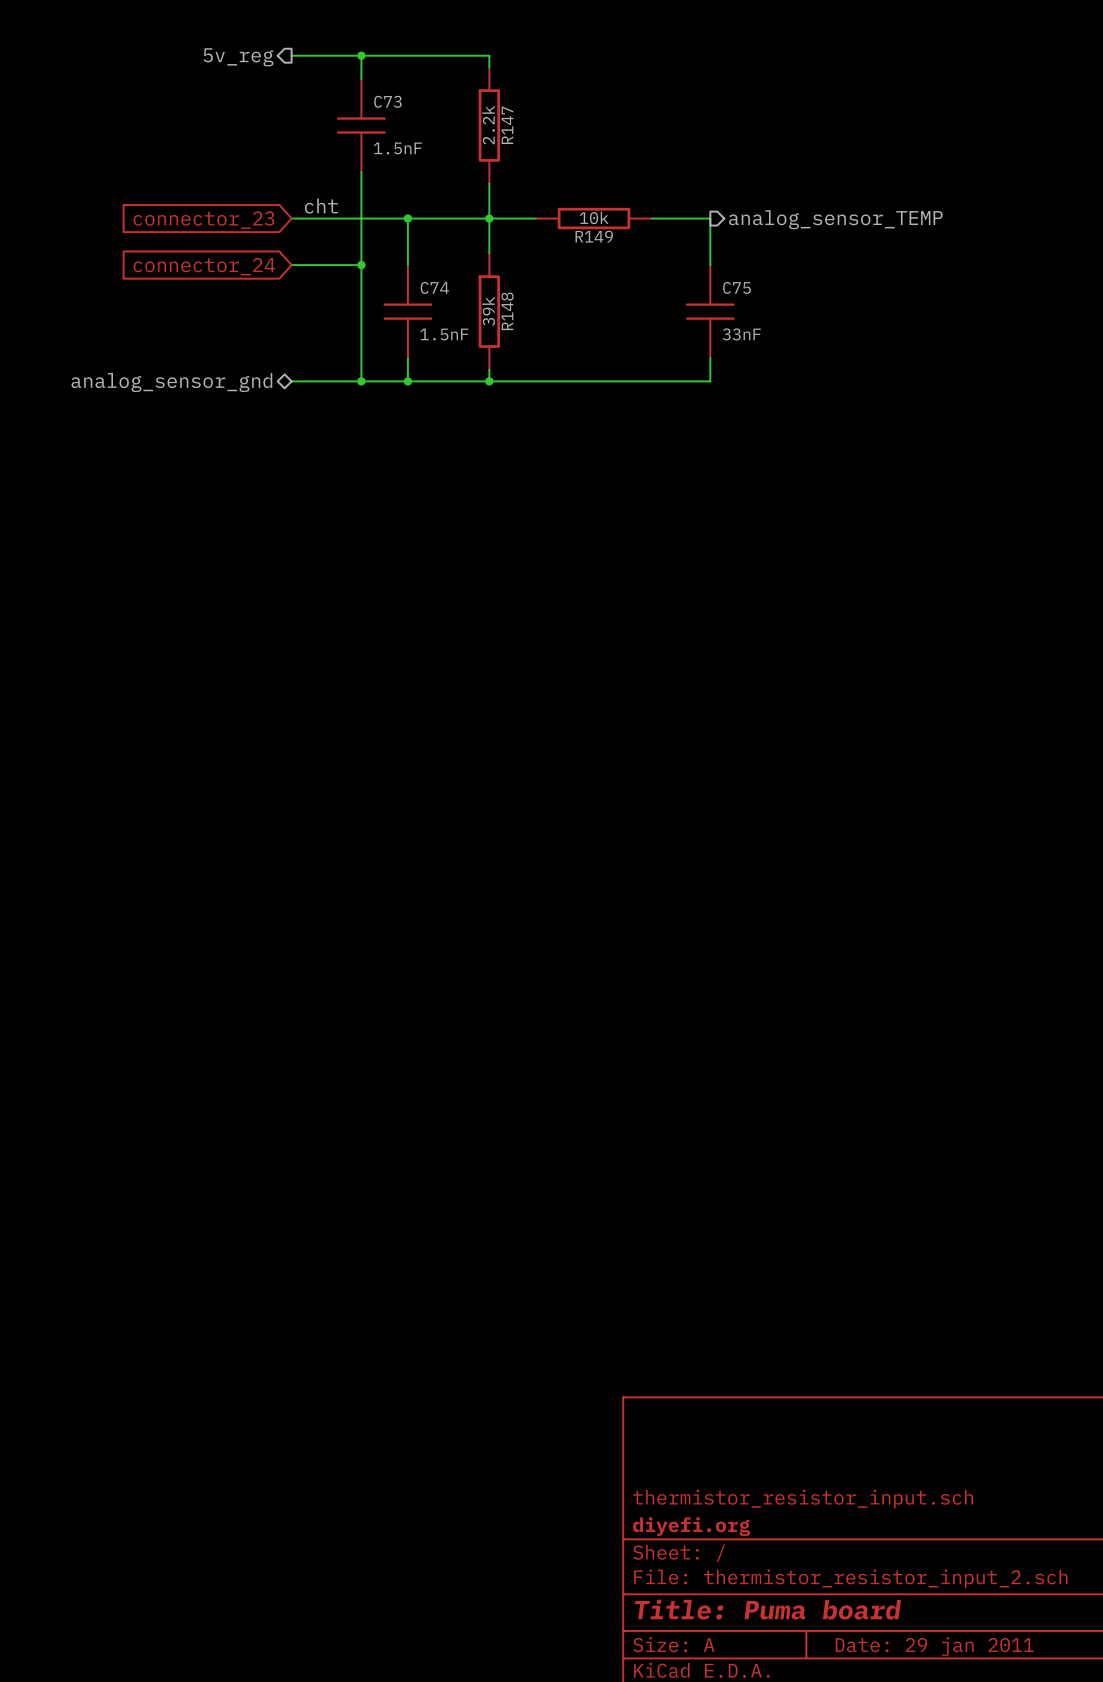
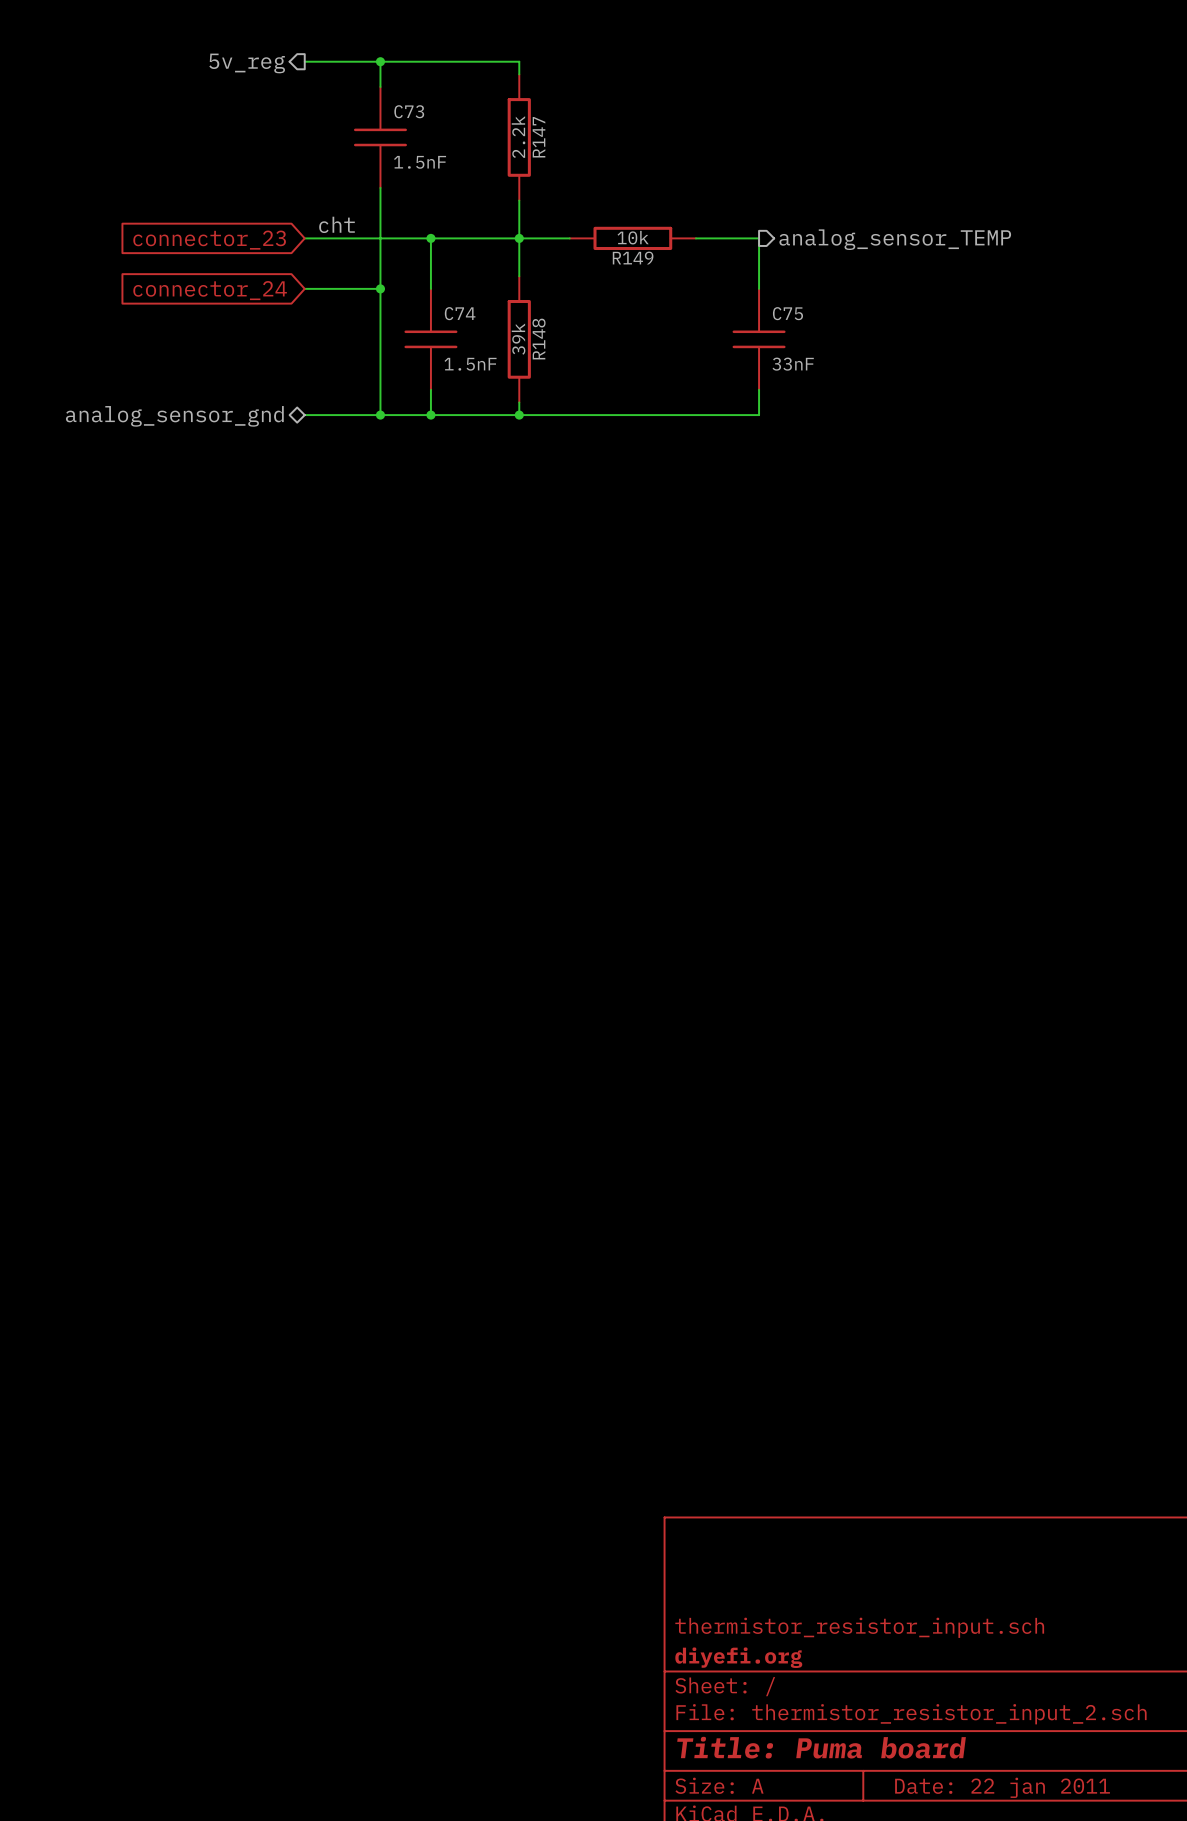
title block: Date: 29 jan 2011 (934, 1646) -> Date: 22 jan 2011 (1002, 1787)

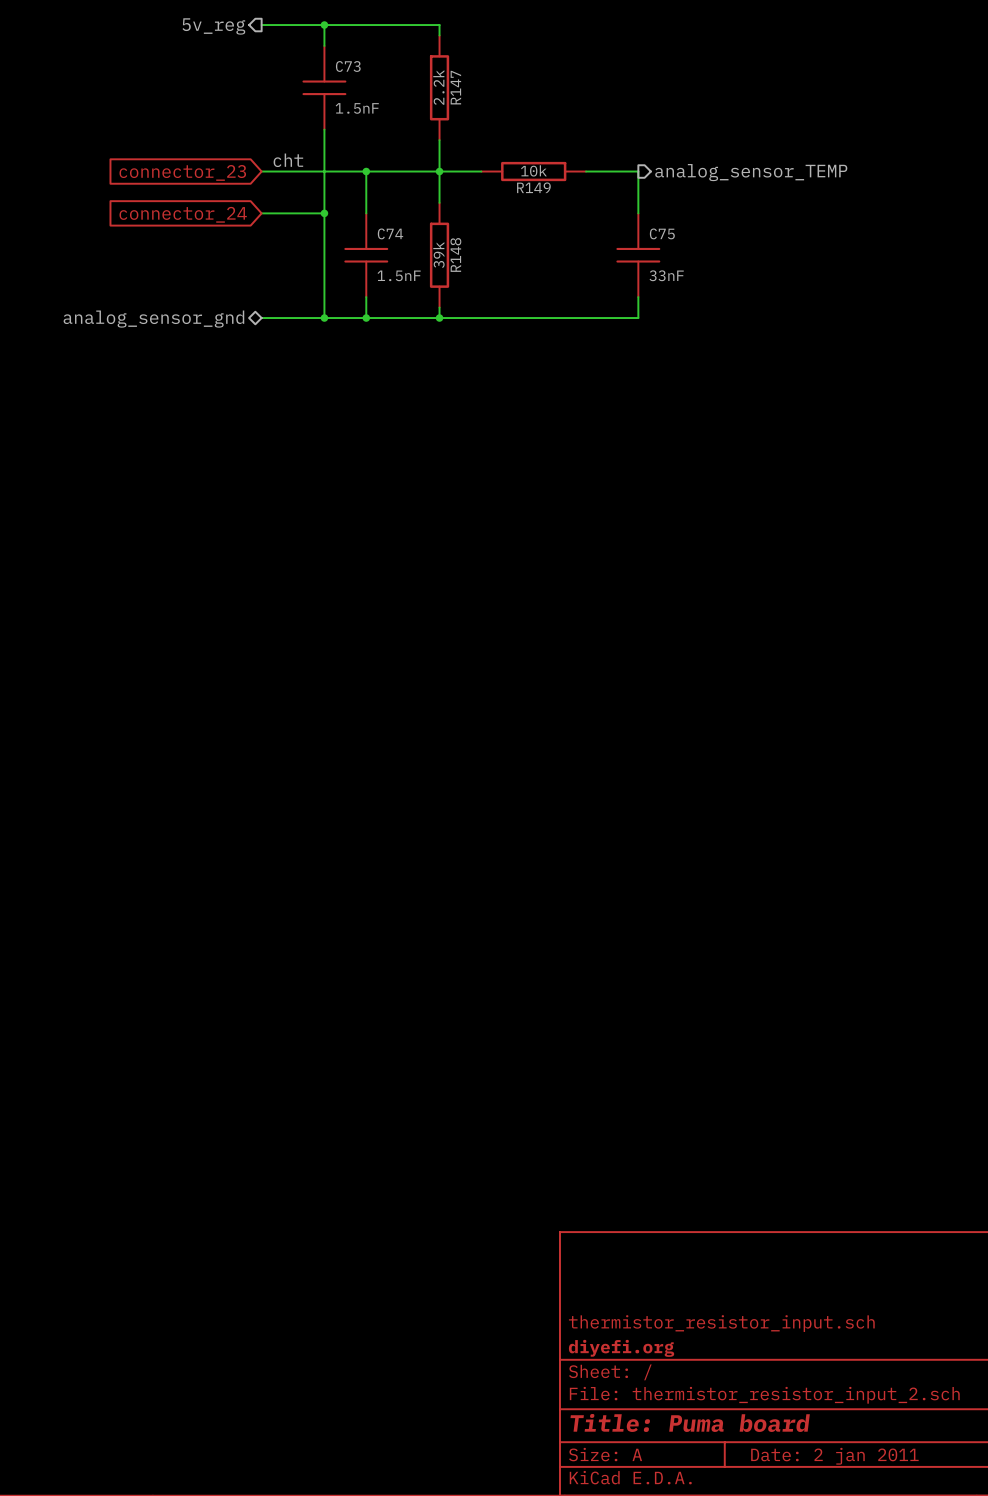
title block: Date: 22 jan 2011 (1002, 1787) -> Date: 2 jan 2011 (834, 1456)

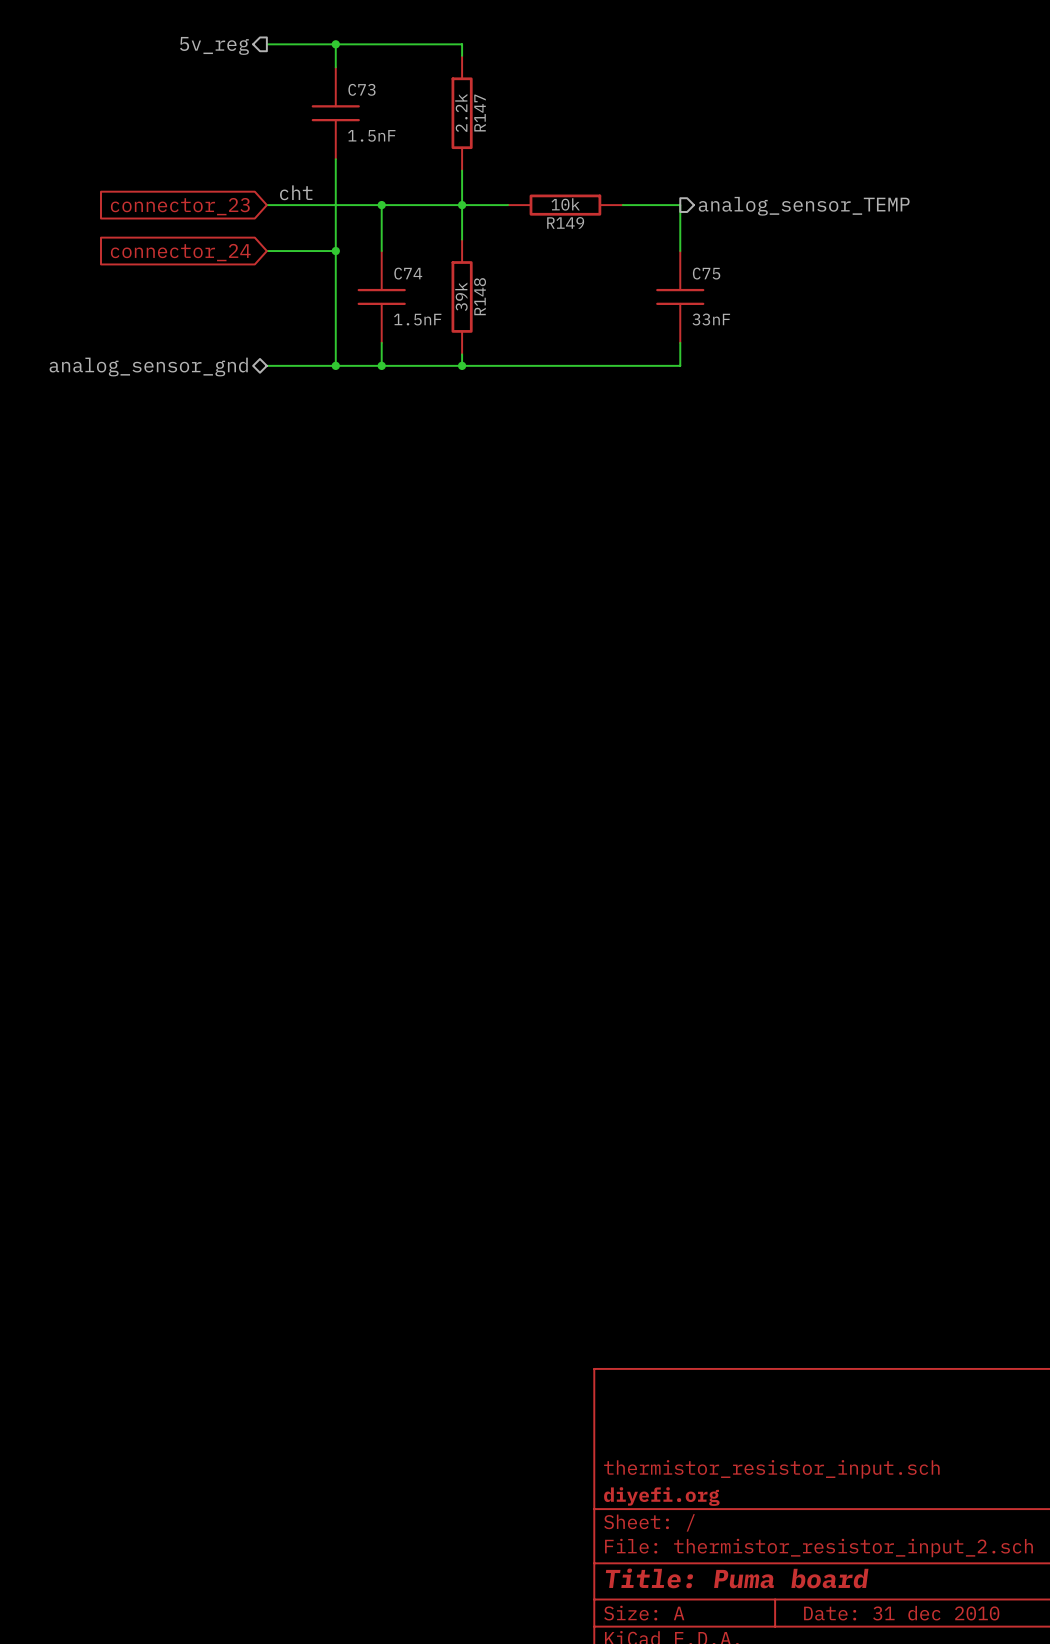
title block: Date: 2 jan 2011 (834, 1456) -> Date: 31 dec 2010 (901, 1613)

